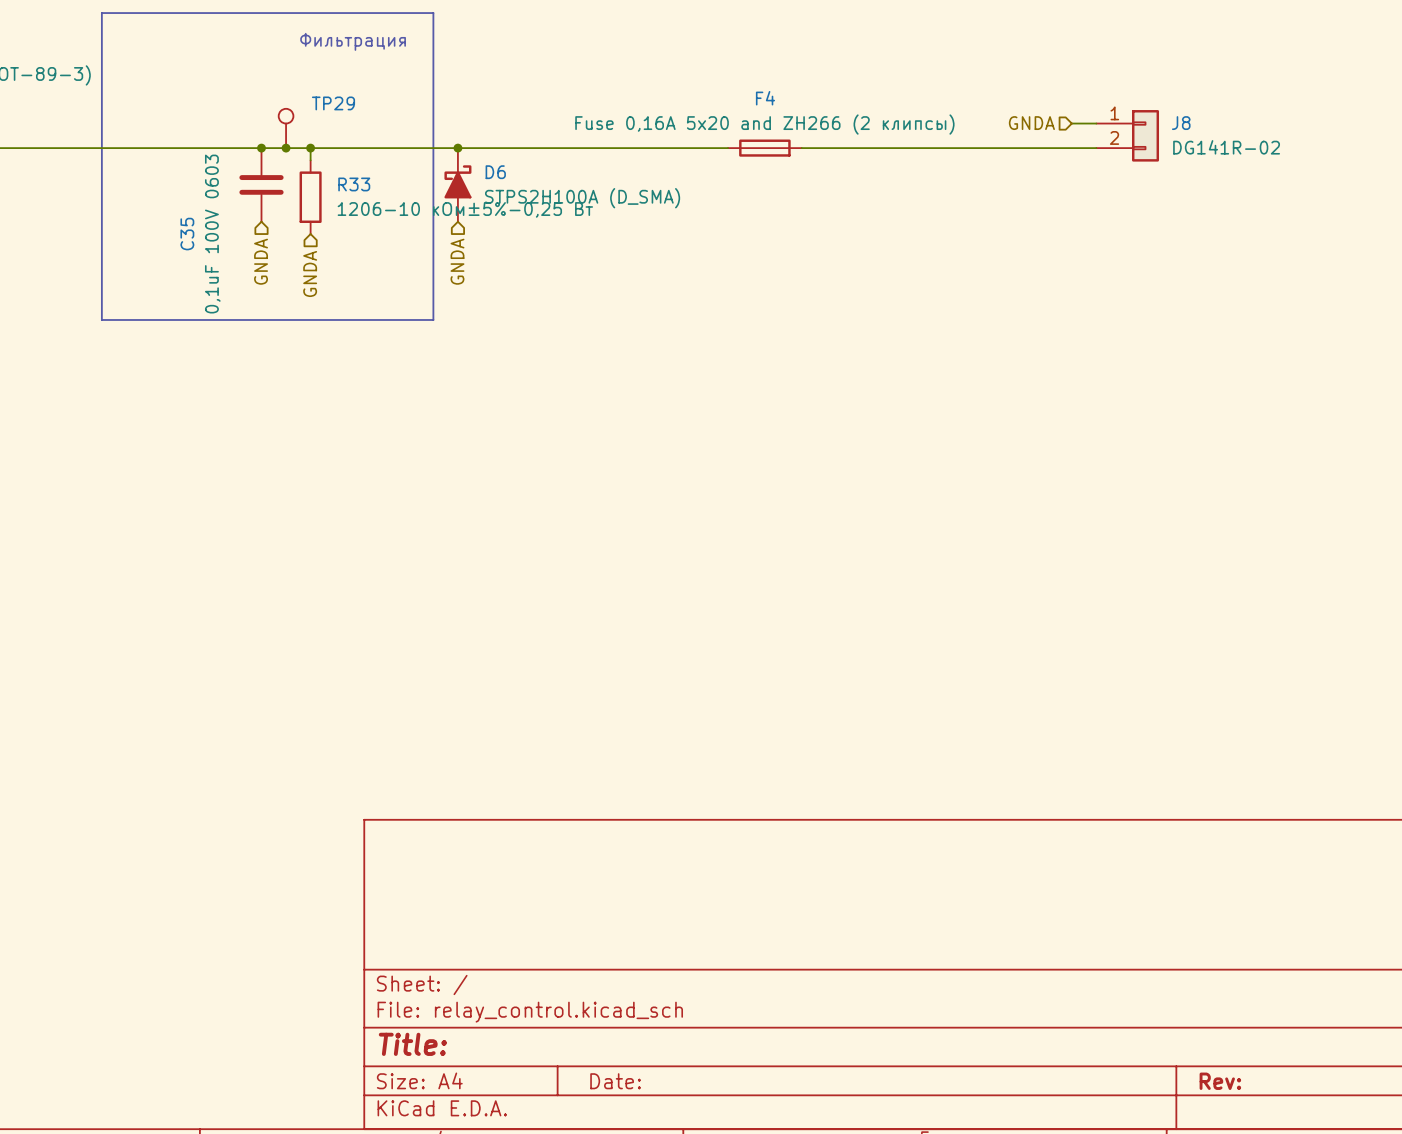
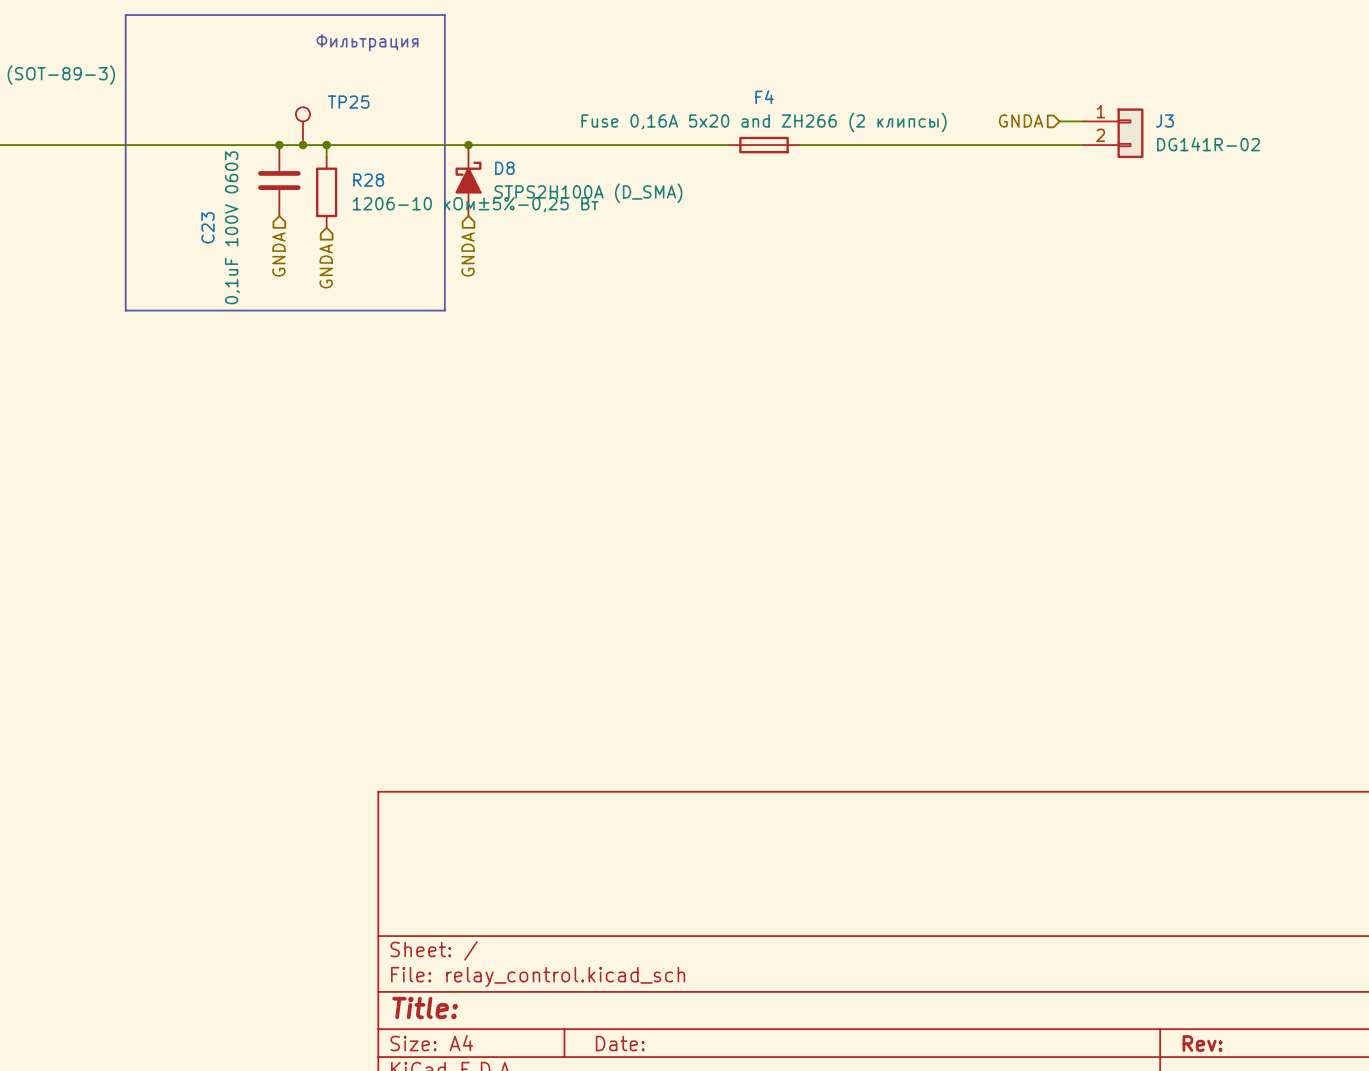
TP29 name: TP29 (333, 103) -> TP25 (348, 102)
J8 name: J8 (1181, 123) -> J3 (1164, 120)
D6 name: D6 (495, 172) -> D8 (504, 168)
R33 name: R33 (354, 184) -> R28 (368, 180)
C35 name: C35 (187, 234) -> C23 (207, 227)

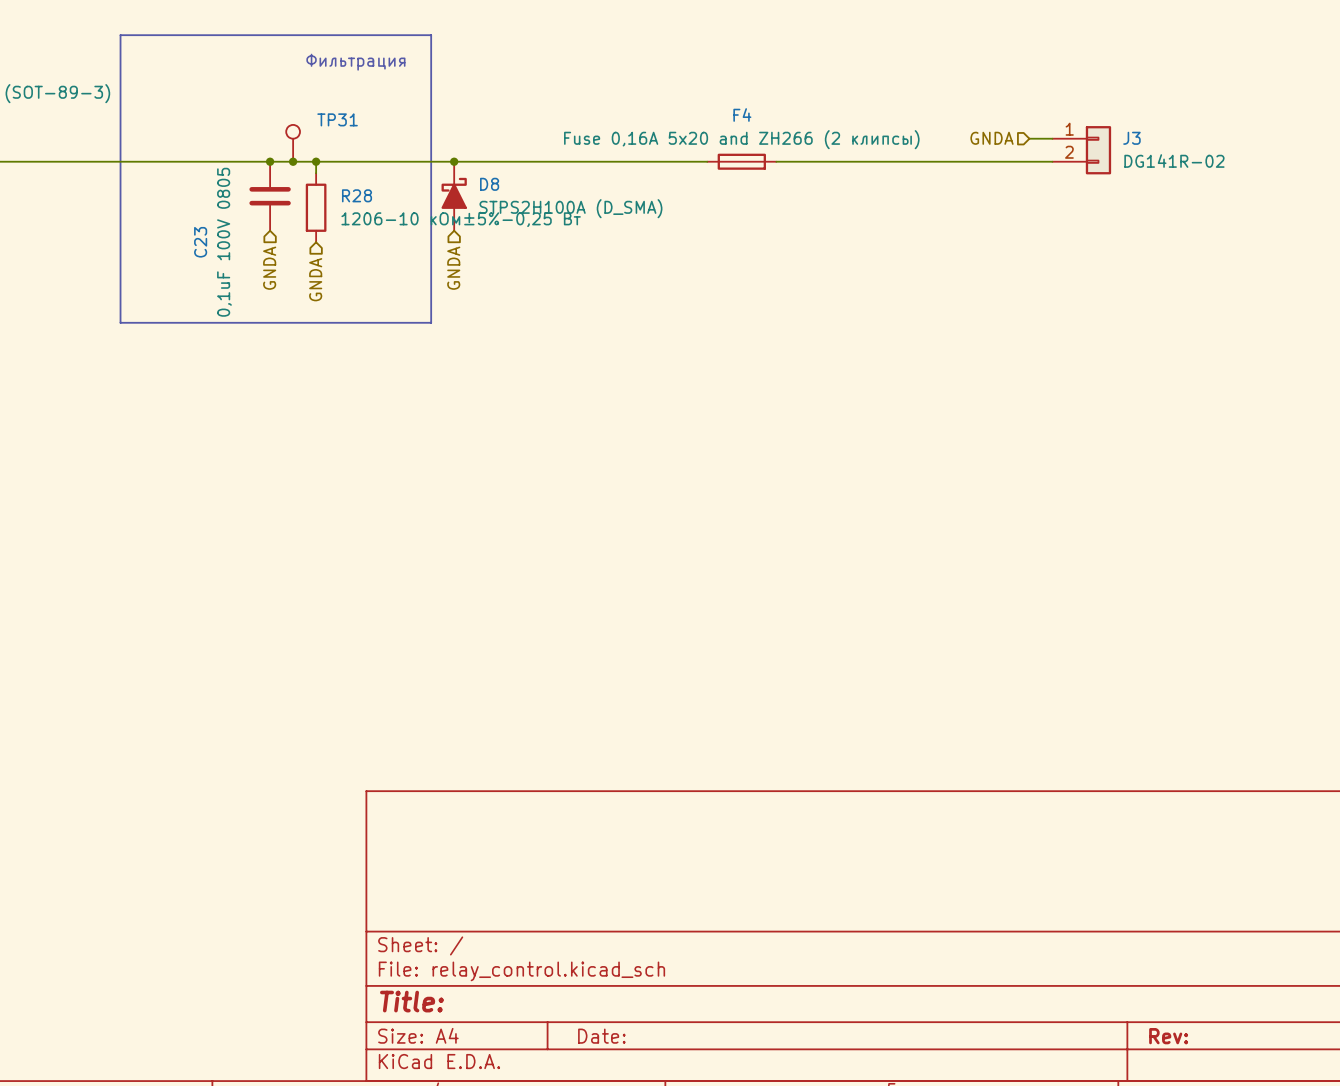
TP25 name: TP25 (348, 102) -> TP31 (337, 119)
C23 value: 0,1uF 100V 0603 (232, 227) -> 0,1uF 100V 0805 (224, 242)

